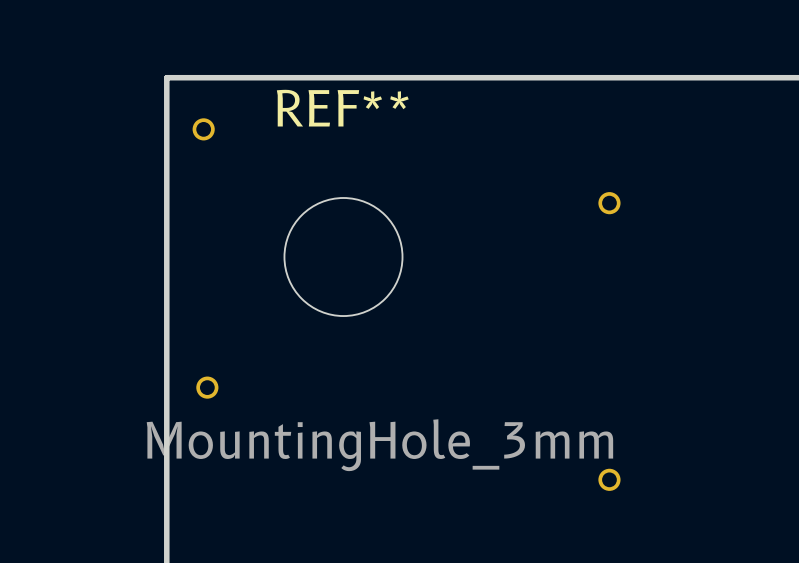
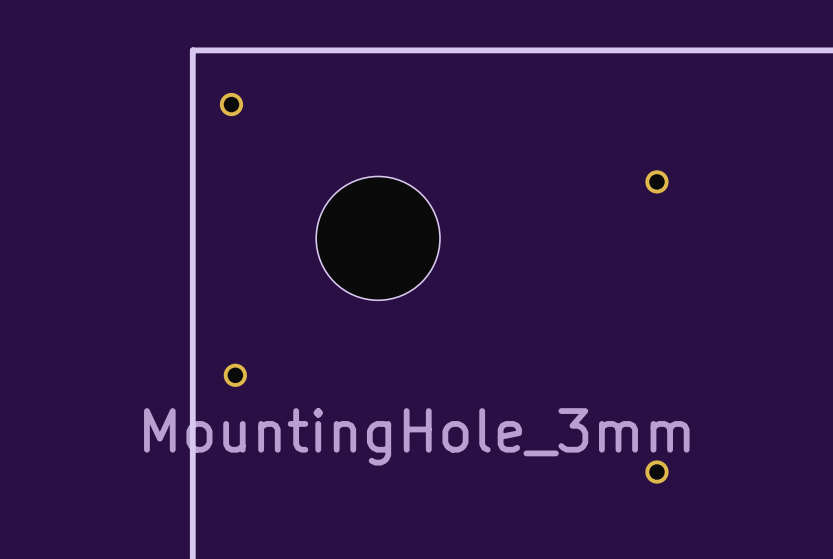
REF** name: REF** (342, 108) -> none

